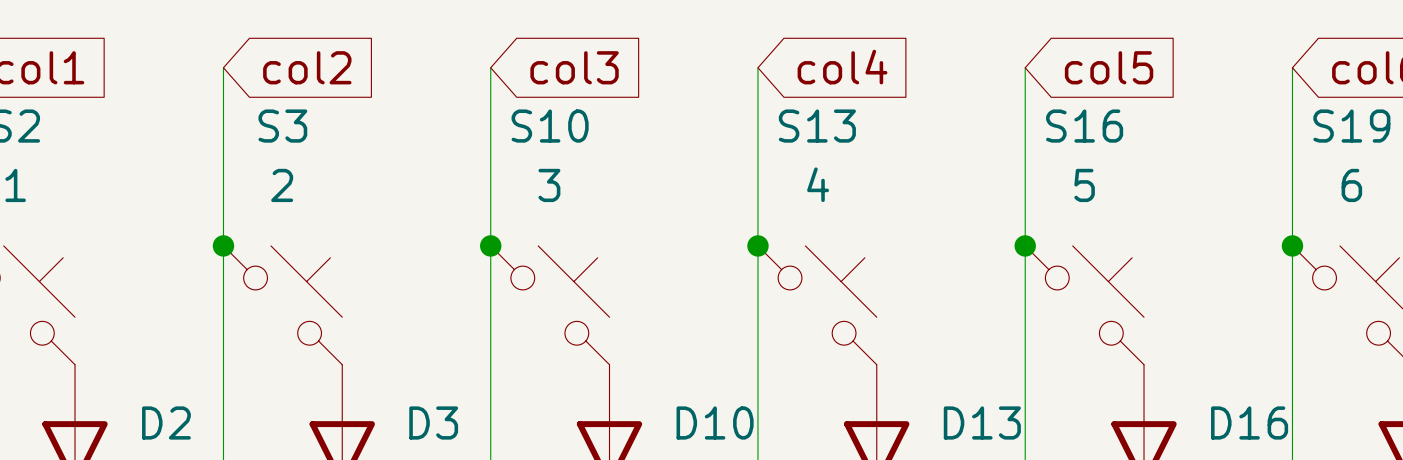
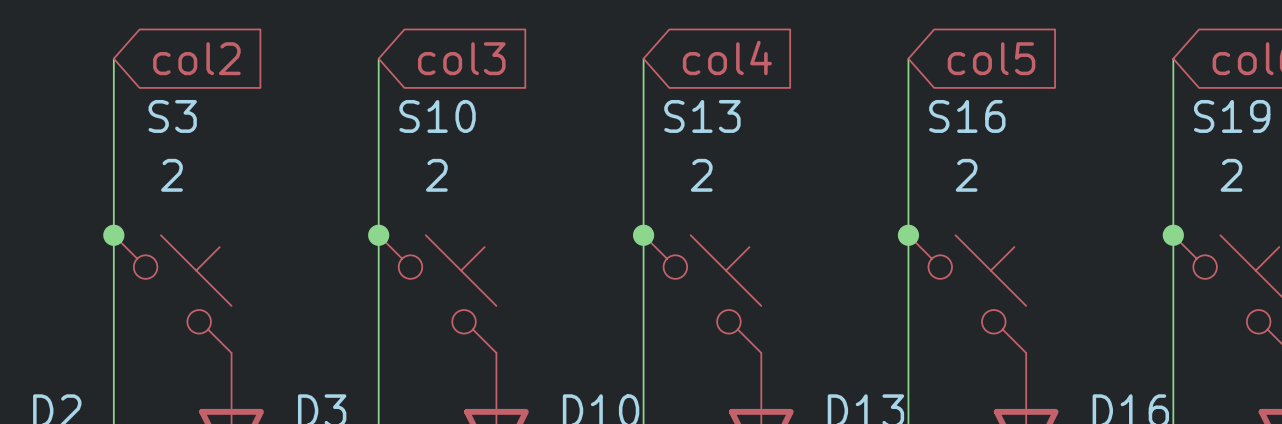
S13 value: 4 (818, 184) -> 2 (701, 175)
S10 value: 3 (549, 185) -> 2 (436, 175)
S16 value: 5 (1084, 185) -> 2 (966, 175)
S19 value: 6 (1351, 185) -> 2 (1231, 175)

